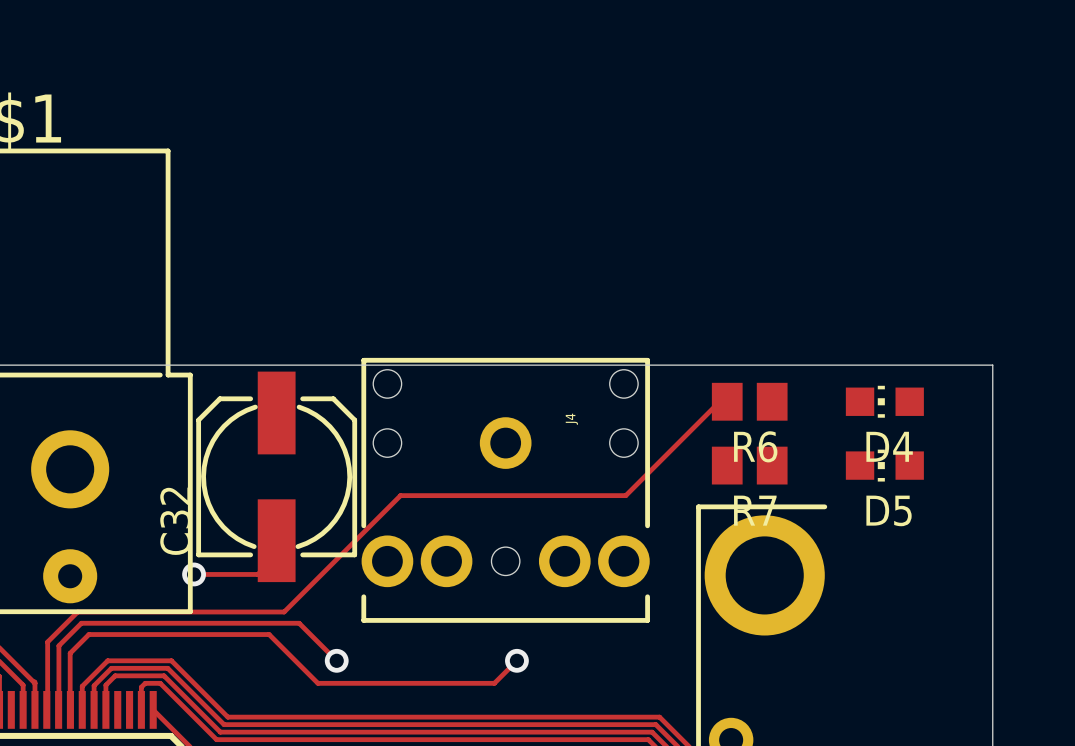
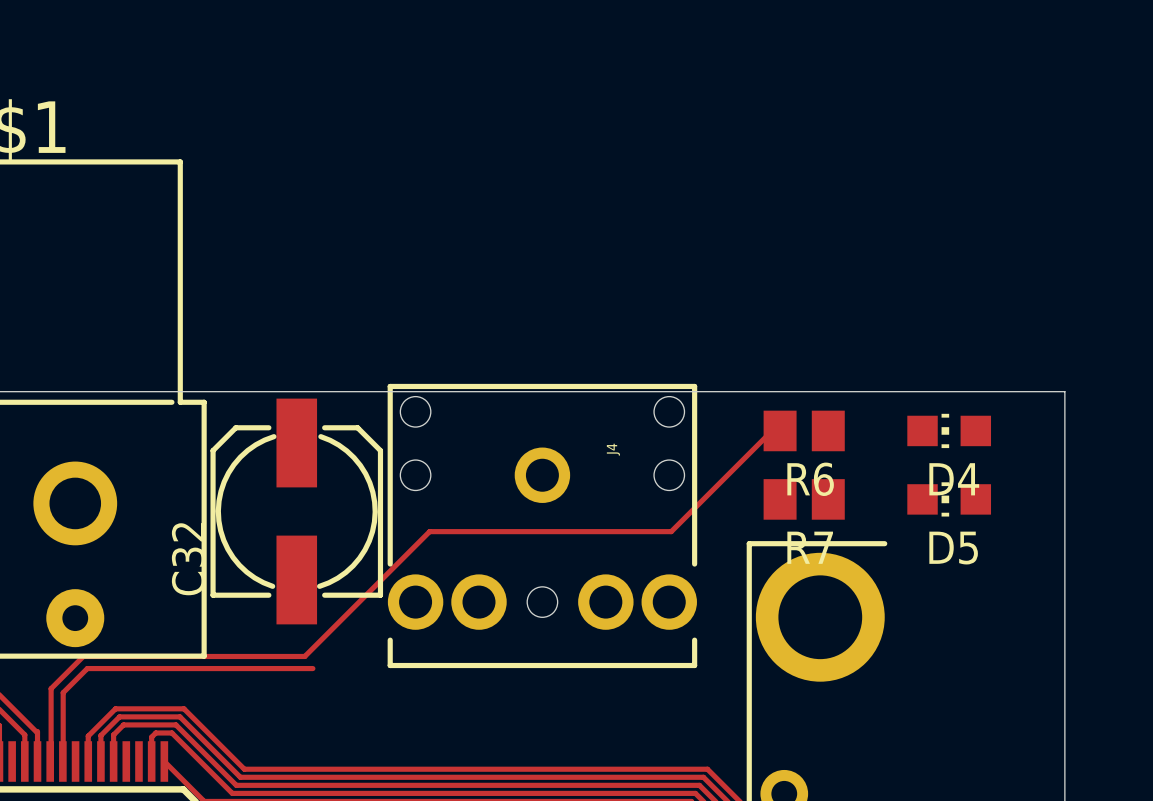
track: (276, 540) (276, 563) (269, 563) (257, 574) (194, 574) -> none
via: (194, 574) -> none
track: (291, 623) (299, 623) (336, 660) -> none
via: (336, 660) -> none
track: (516, 660) (494, 683) (317, 683) (269, 634) (88, 634) (70, 653) (70, 709) -> none
via: (516, 660) -> none

